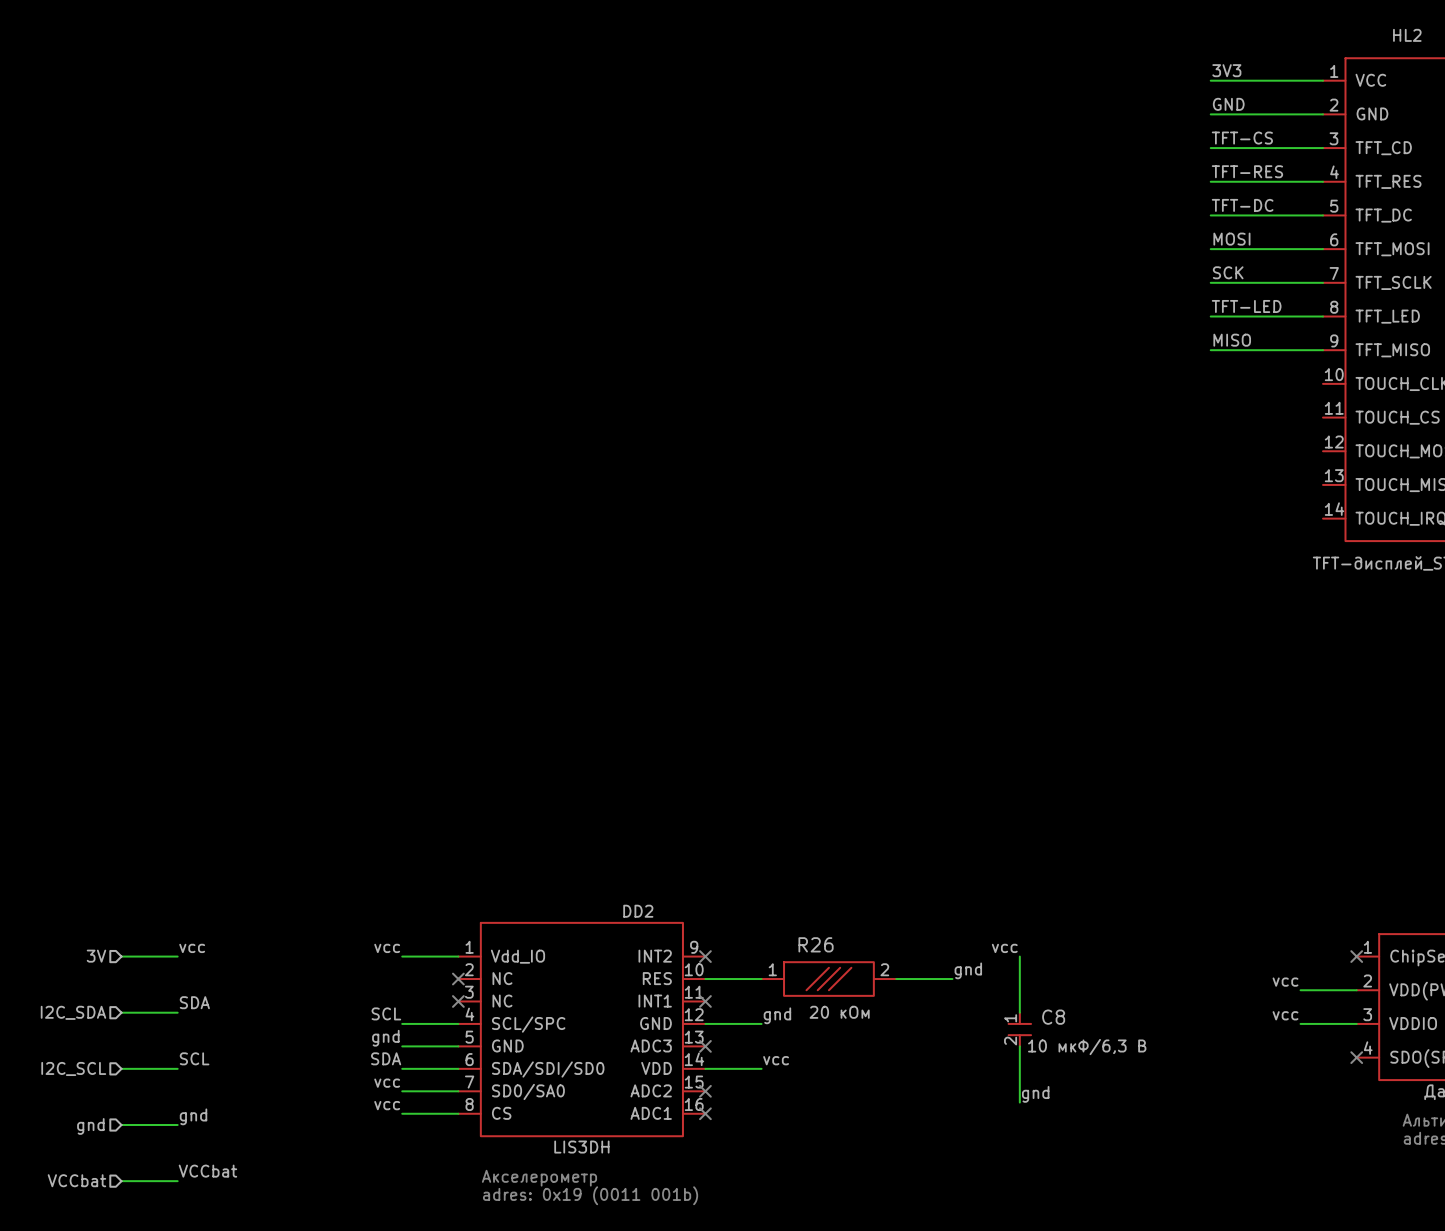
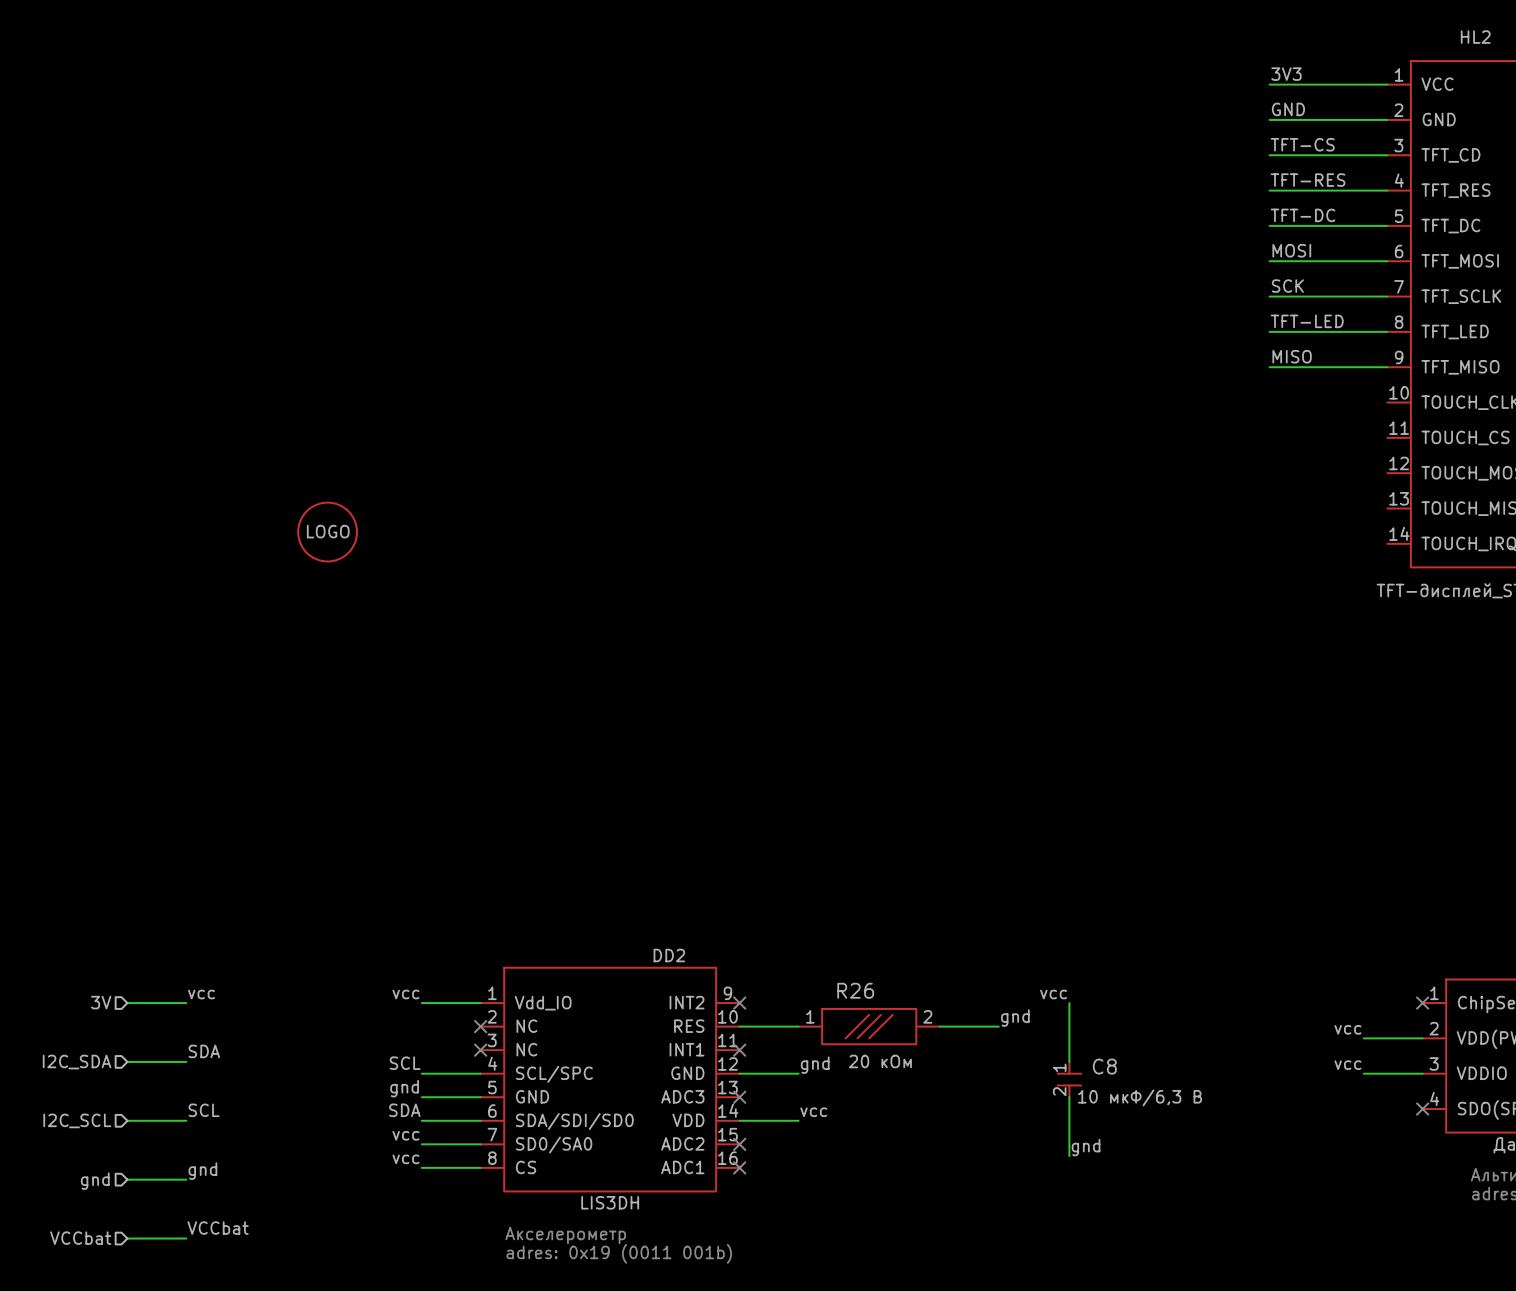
part: none -> LOGO (327, 532)

